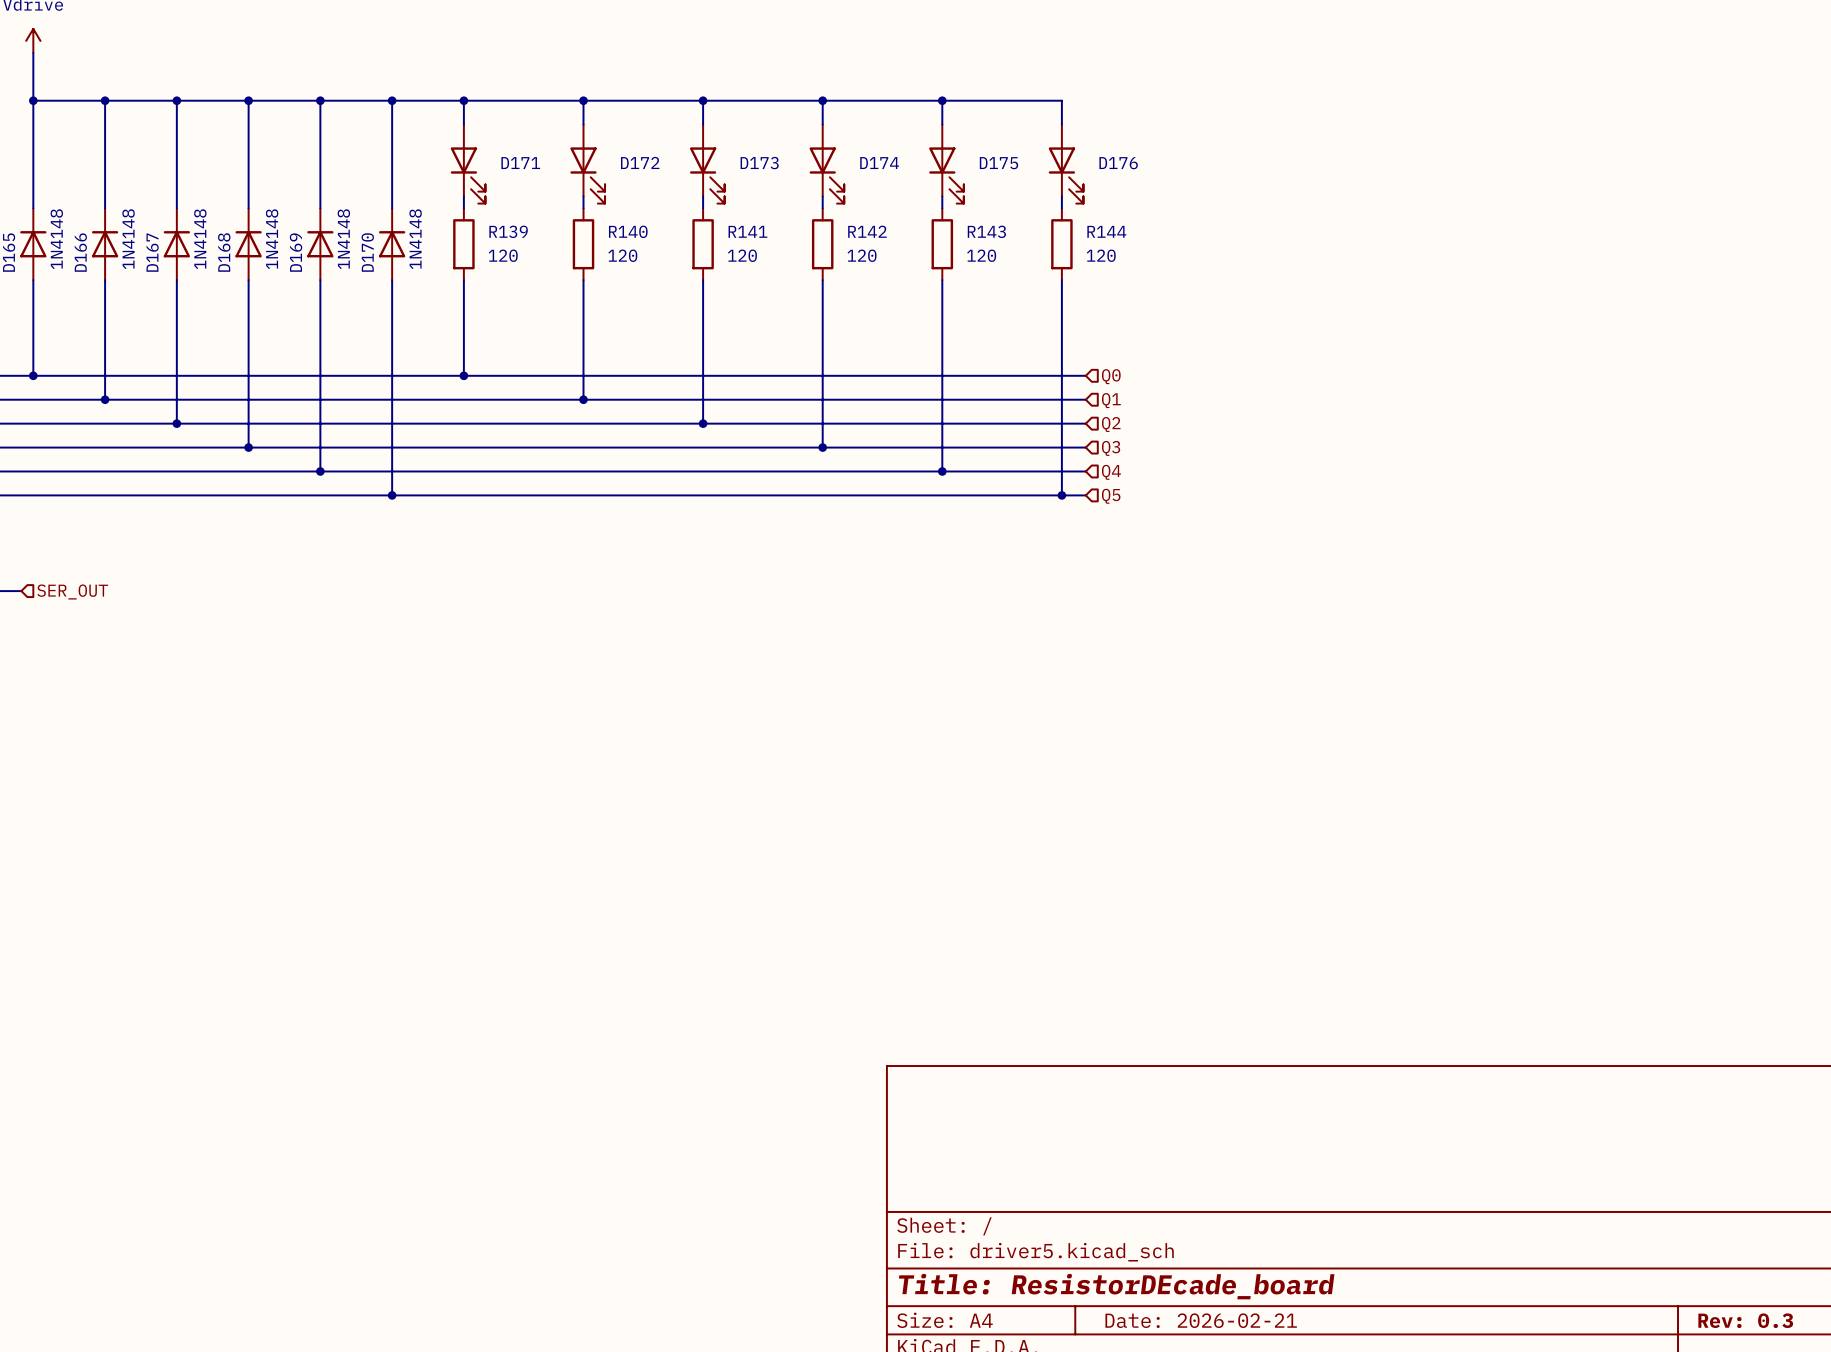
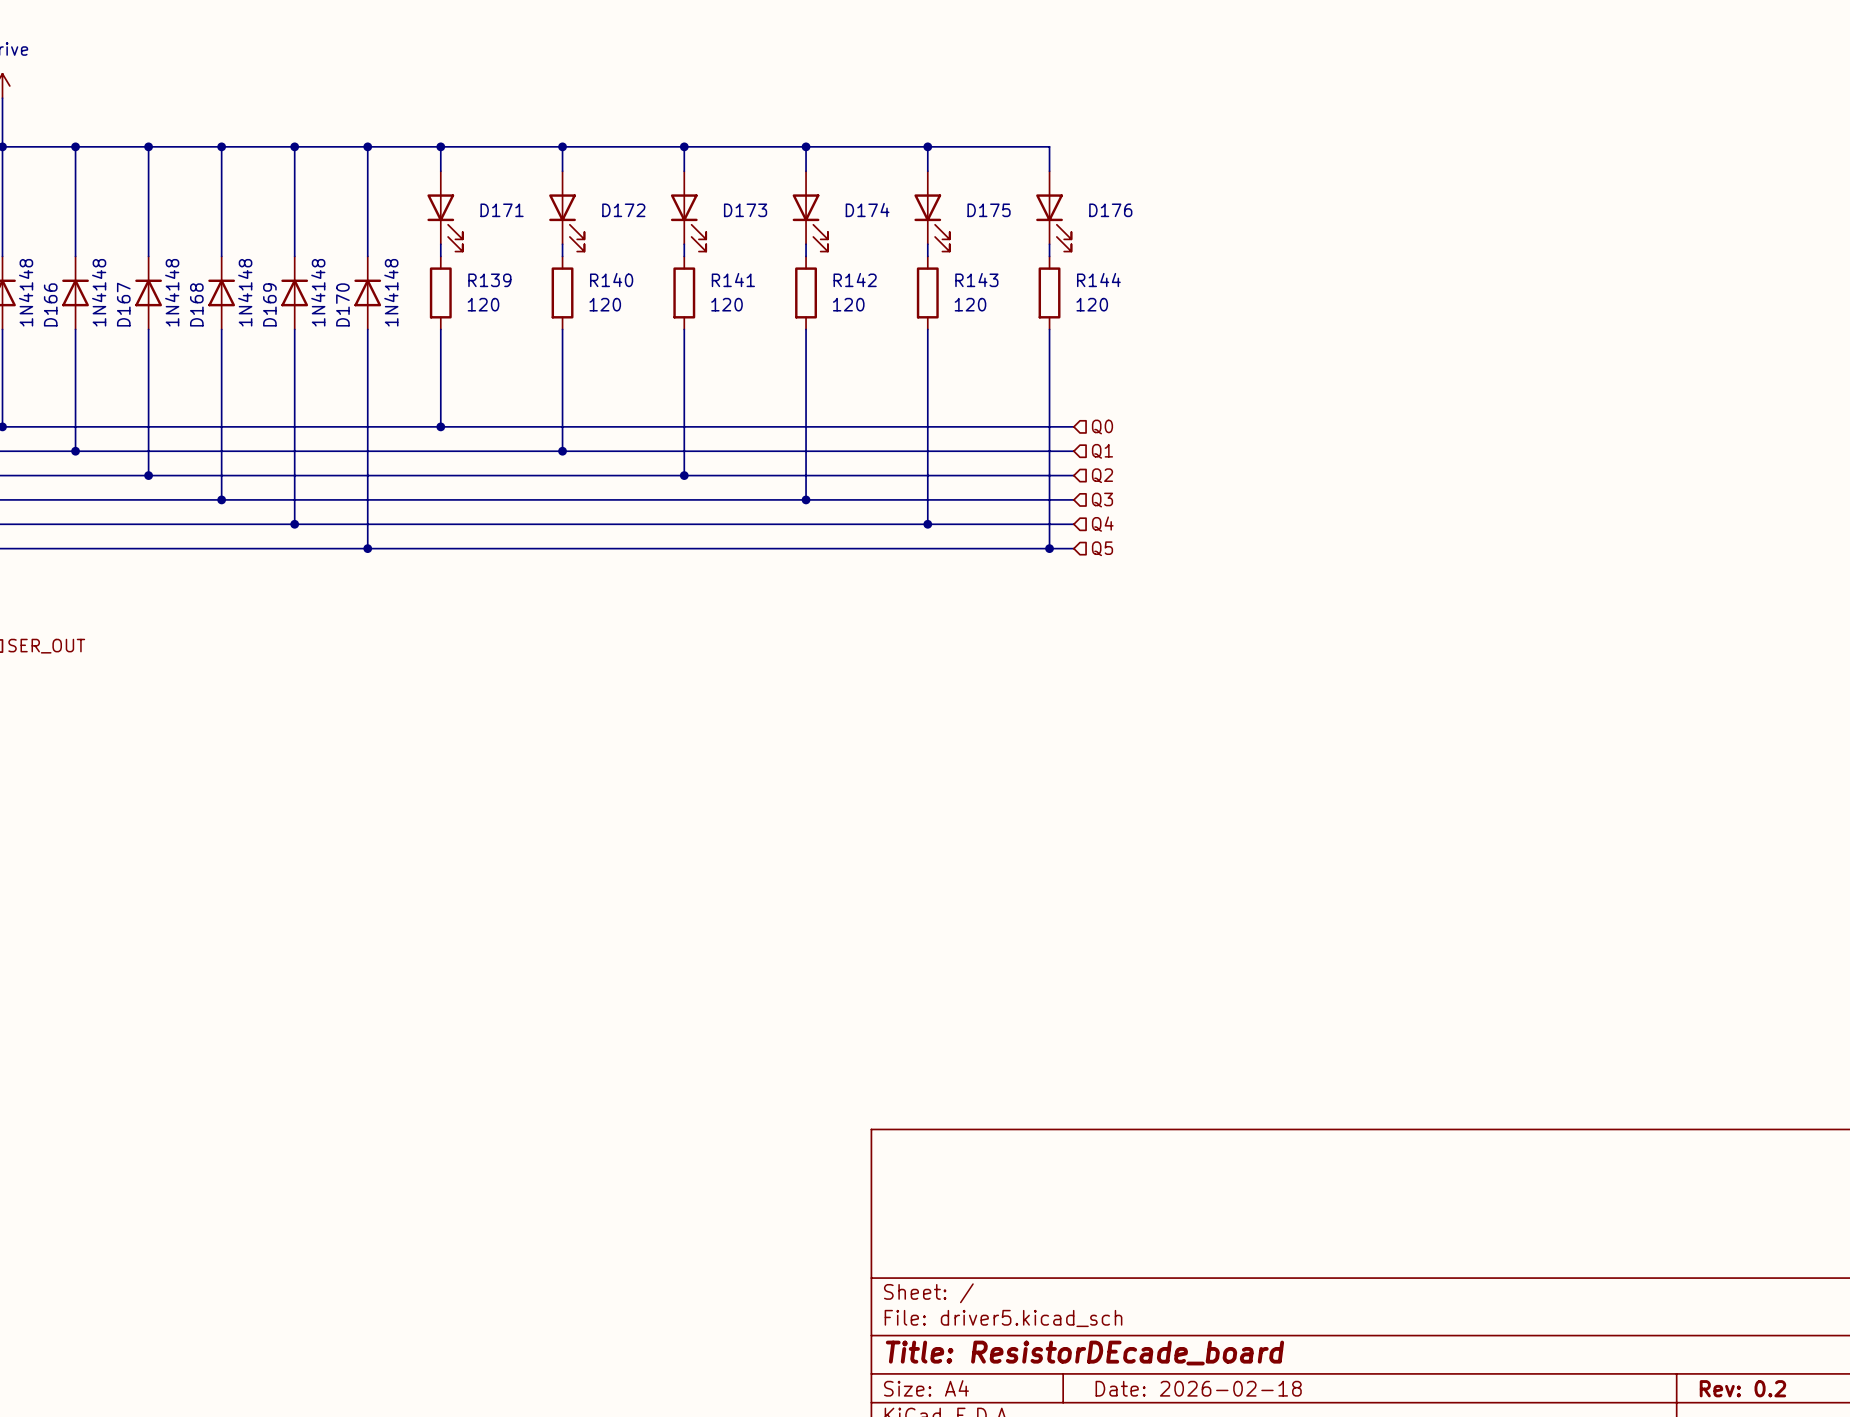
title block: Date: 2026-02-21 (1201, 1320) -> Date: 2026-02-18 (1198, 1388)
title block: Rev: 0.3 (1745, 1320) -> Rev: 0.2 (1742, 1388)

